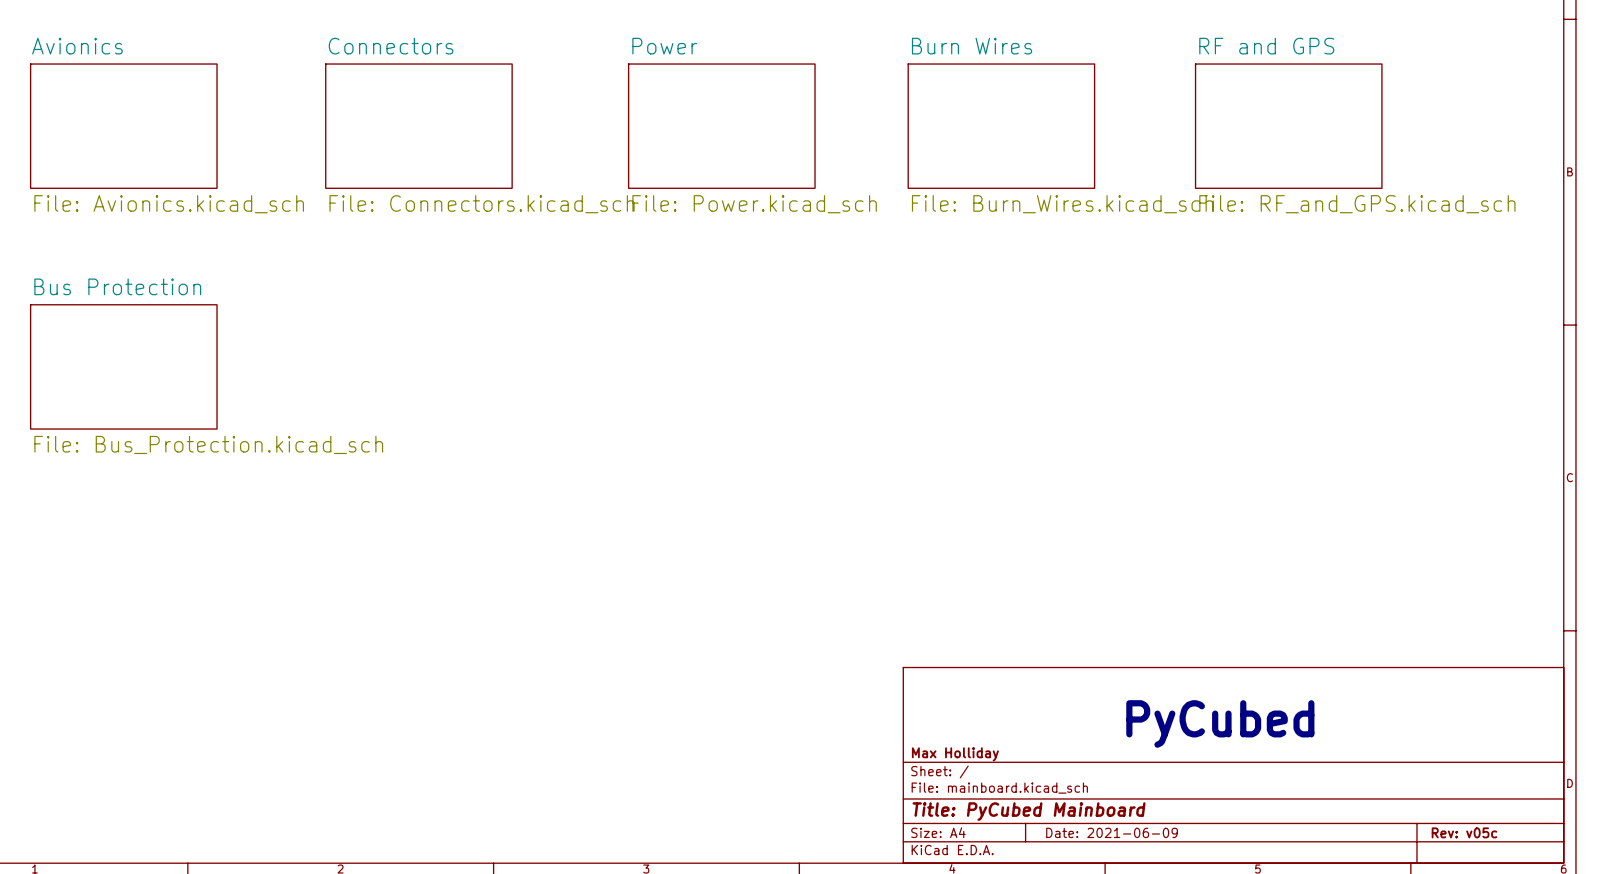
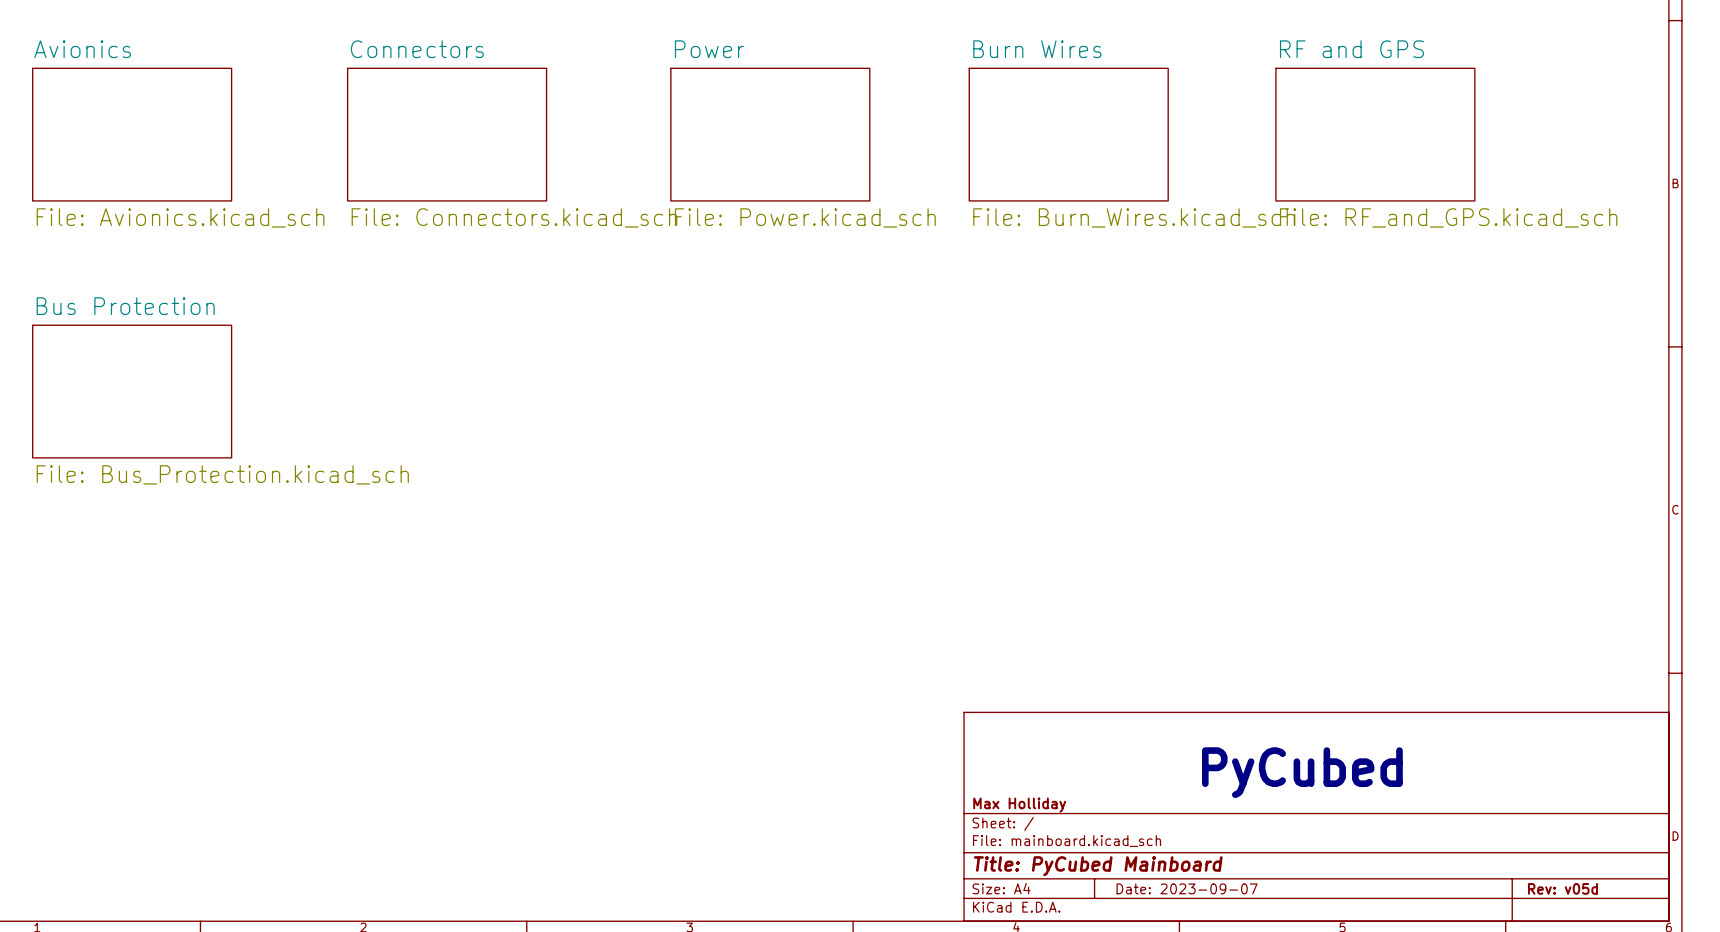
title block: Date: 2021-06-09 (1112, 832) -> Date: 2023-09-07 (1187, 888)
title block: Rev: v05c (1464, 832) -> Rev: v05d (1562, 888)

